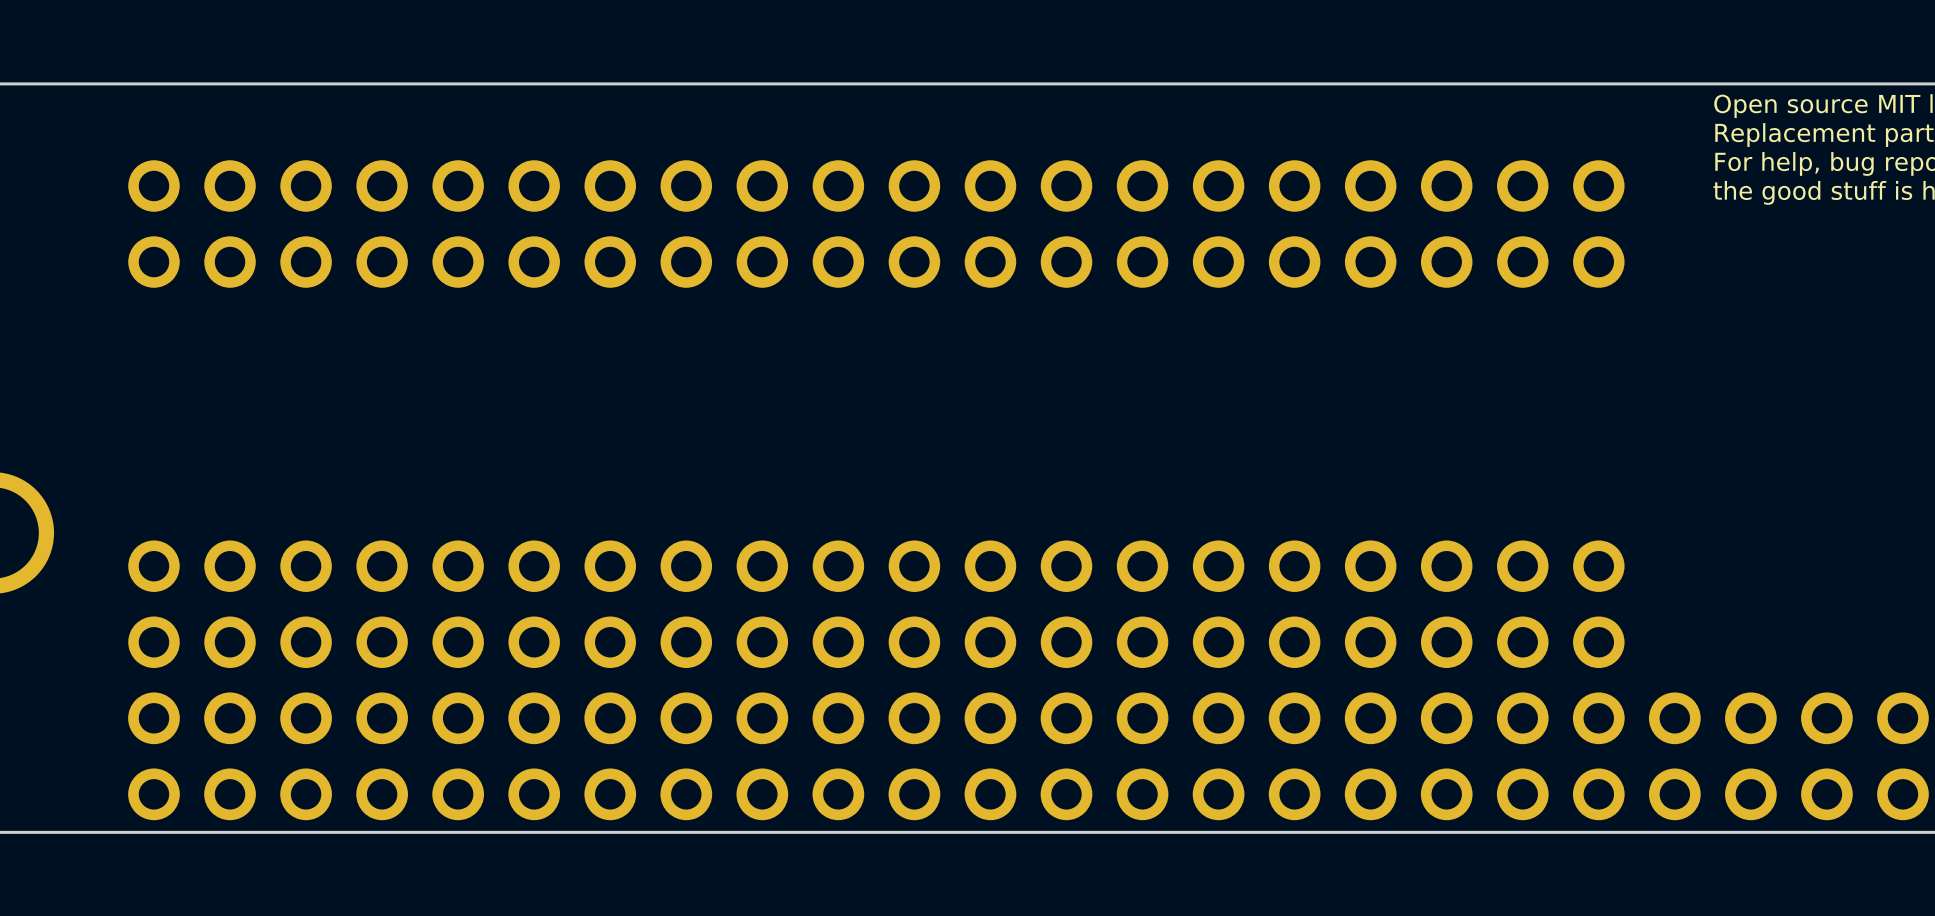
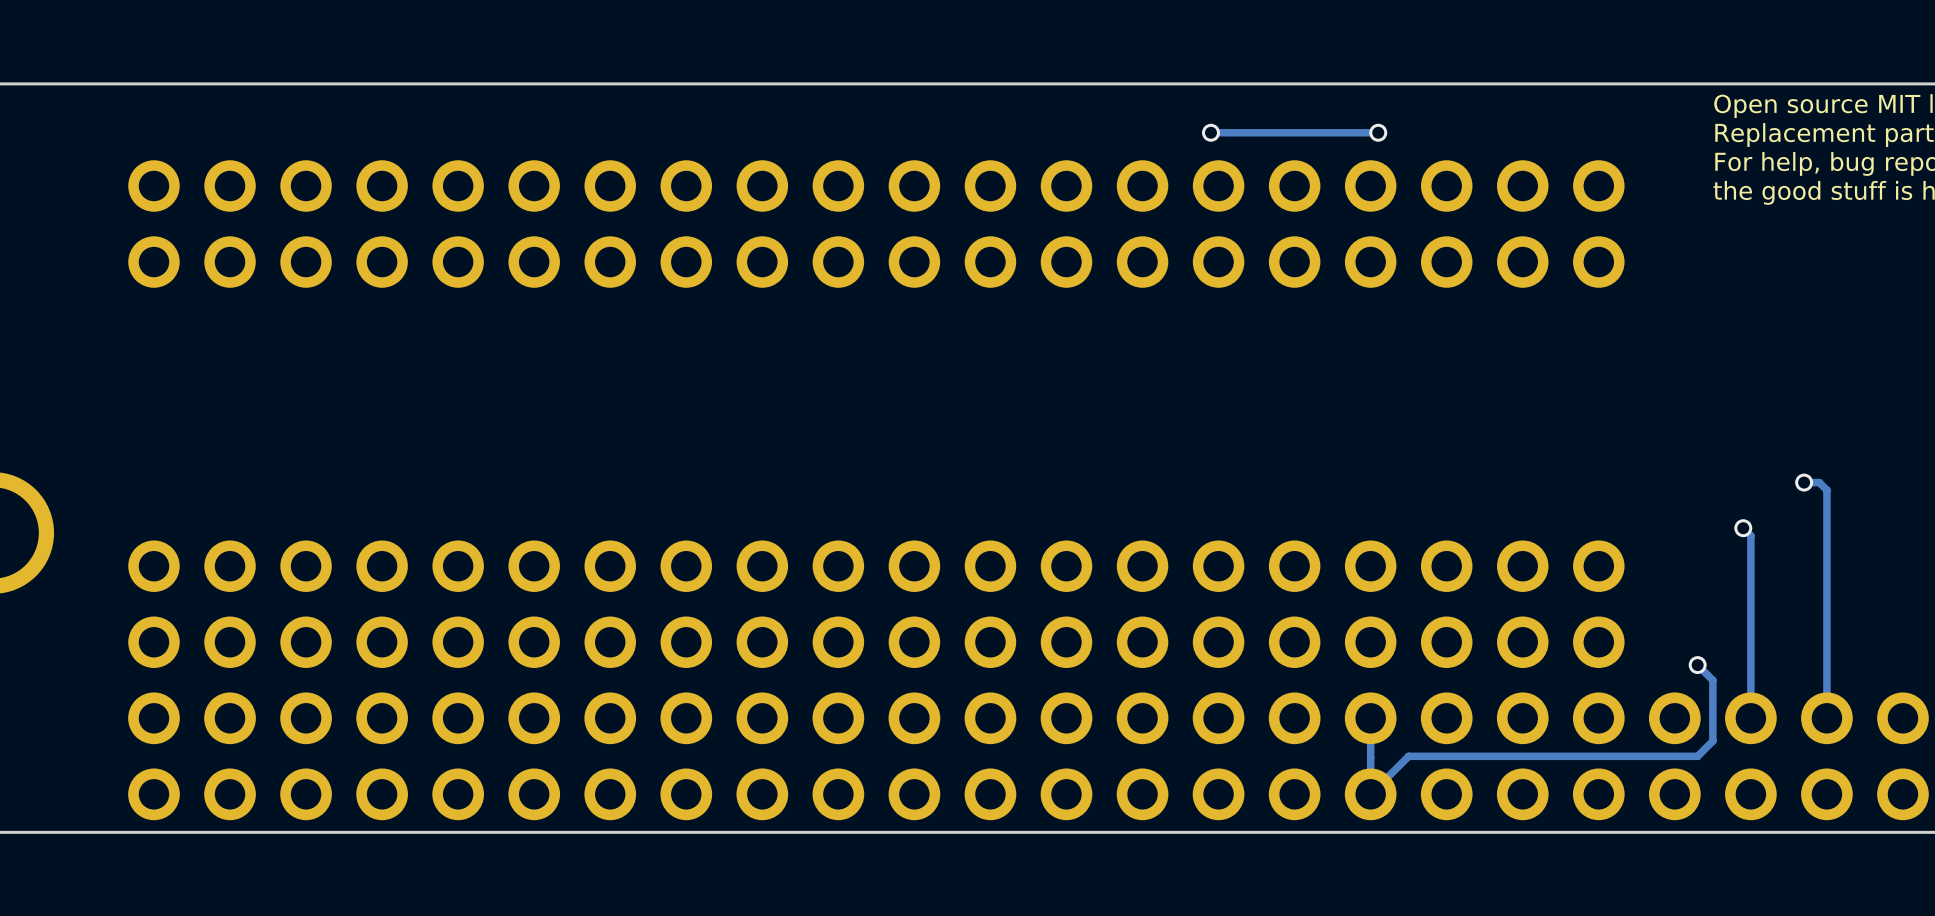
via: none -> (1210, 132)
track: none -> (1378, 132) (1210, 132)
via: none -> (1378, 132)
track: none -> (1804, 482) (1819, 482) (1826, 490) (1826, 718)
via: none -> (1804, 482)
track: none -> (1743, 528) (1750, 535) (1750, 718)
via: none -> (1743, 528)
track: none -> (1697, 665) (1712, 680) (1712, 741) (1697, 756) (1408, 756) (1370, 794) (1370, 718)
via: none -> (1697, 665)

